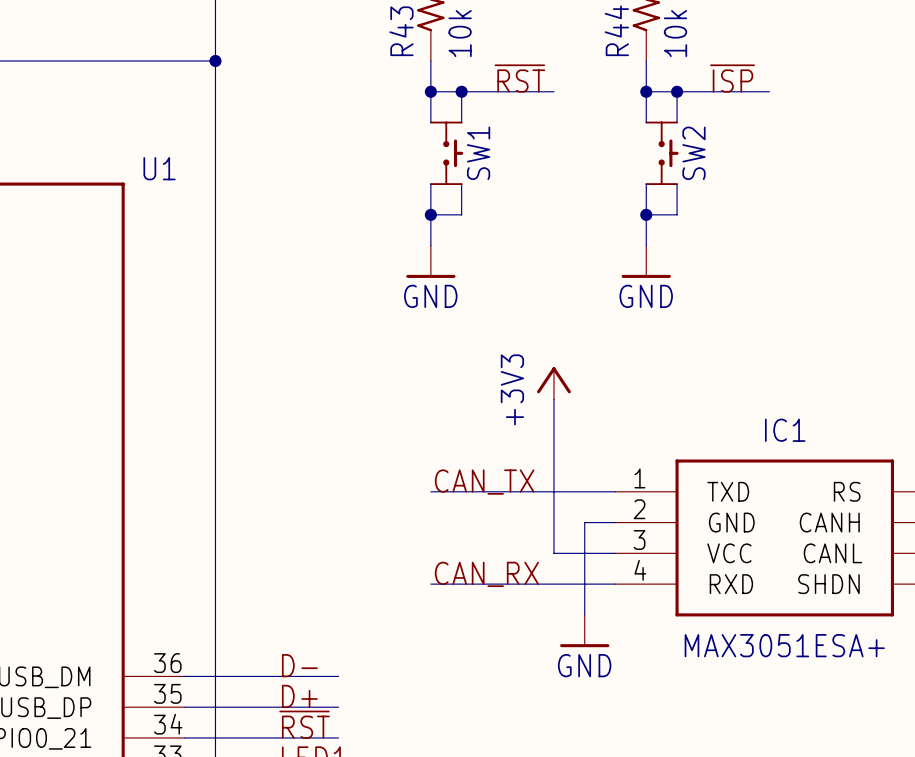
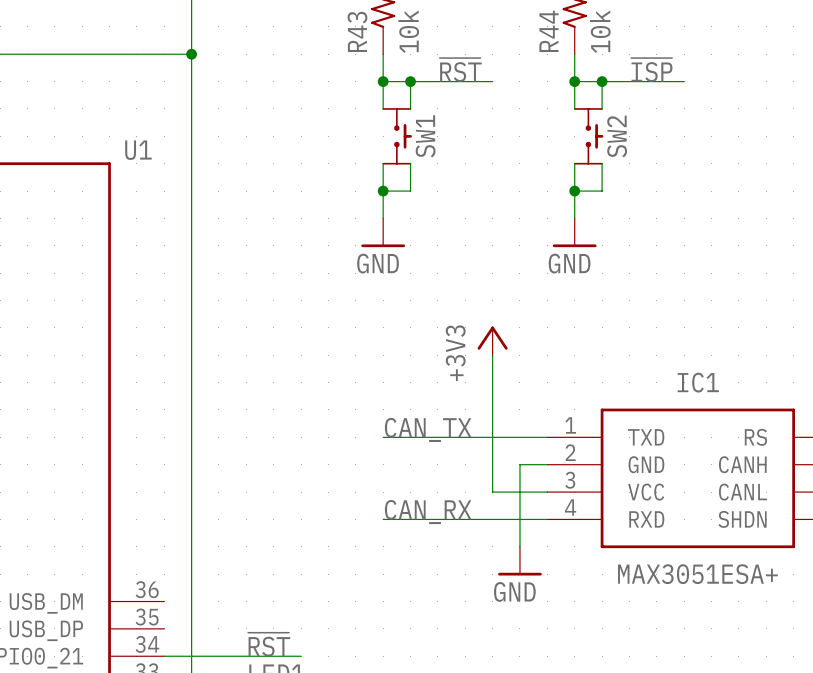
label: D- (299, 665) -> none
wire: (184, 676) (338, 676) -> none
label: D+ (299, 696) -> none
wire: (184, 707) (338, 707) -> none

